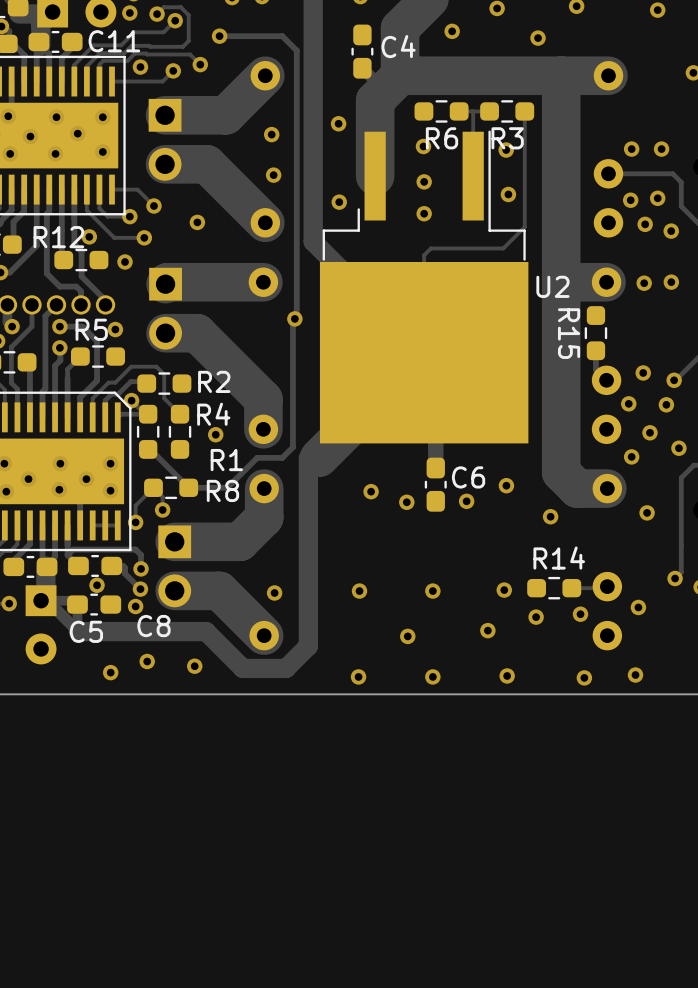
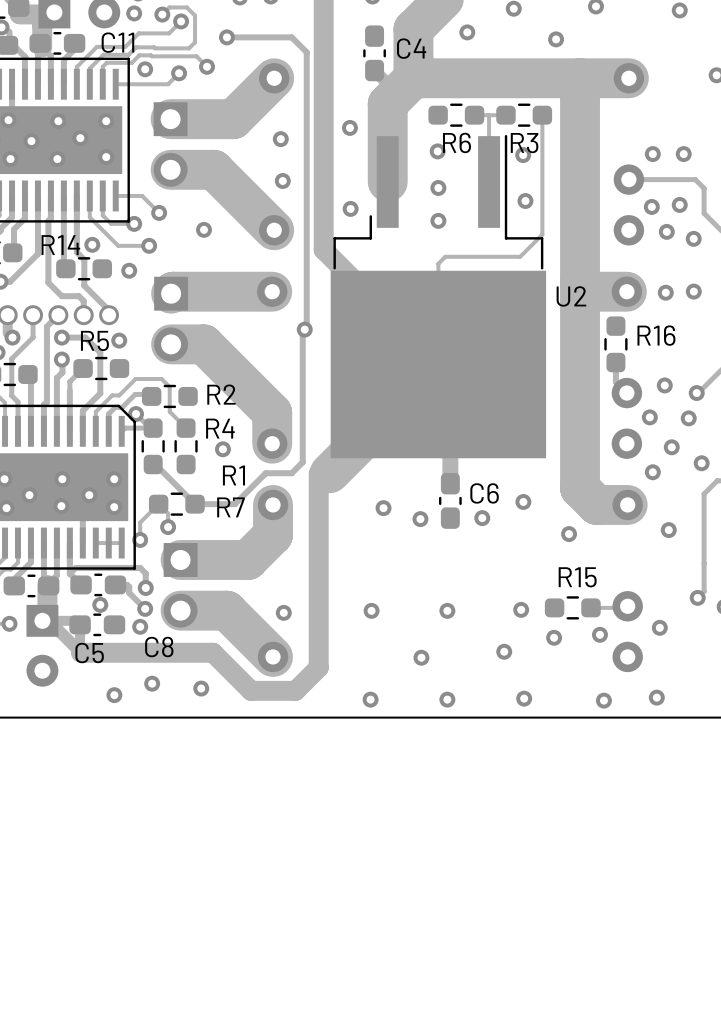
R12 name: R12 (58, 237) -> R14 (60, 245)
R15 name: R15 (569, 333) -> R16 (656, 335)
R8 name: R8 (222, 490) -> R7 (230, 507)
R14 name: R14 (559, 558) -> R15 (577, 577)

